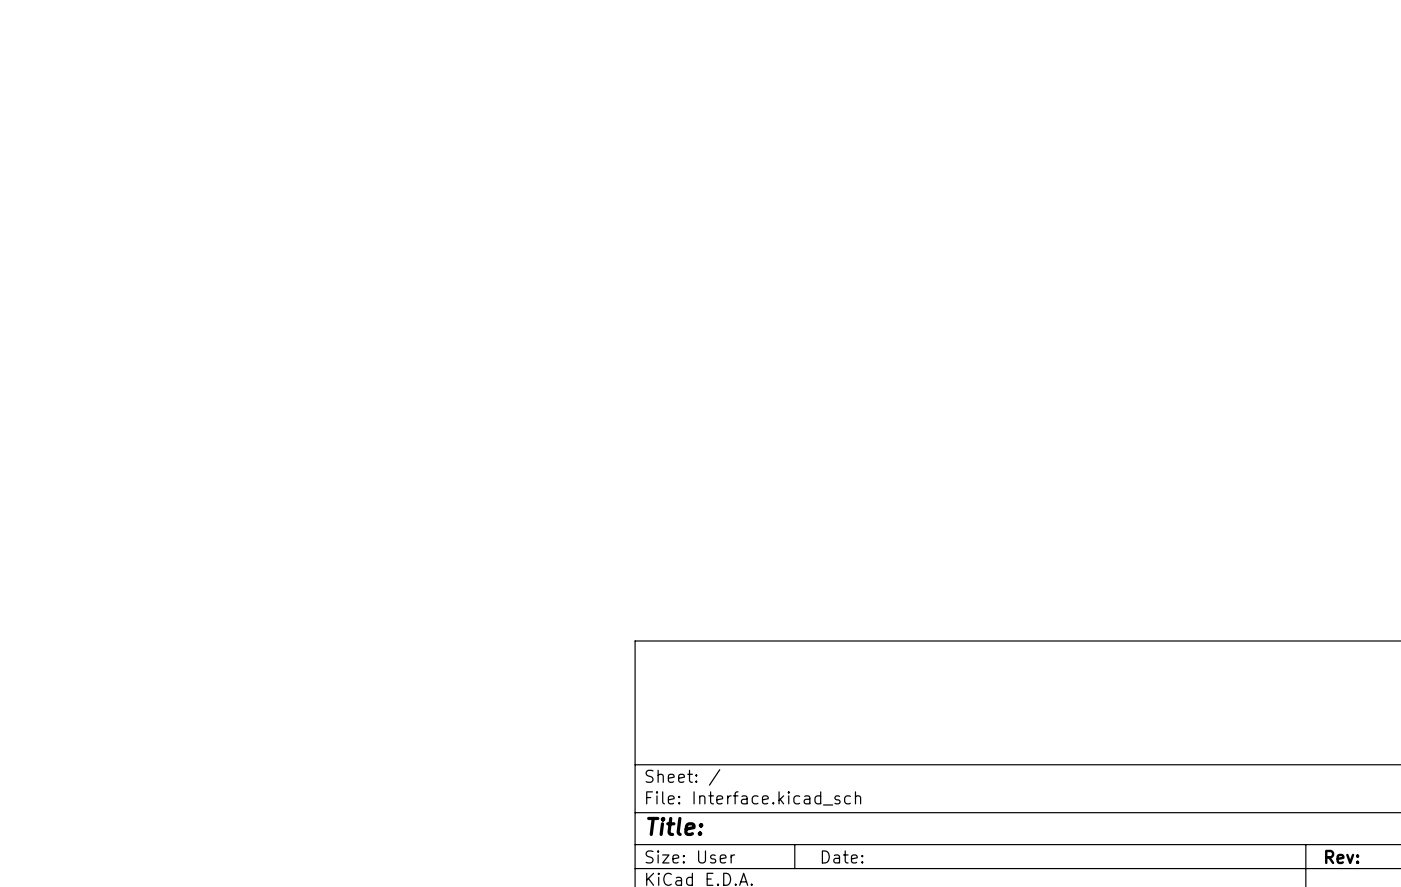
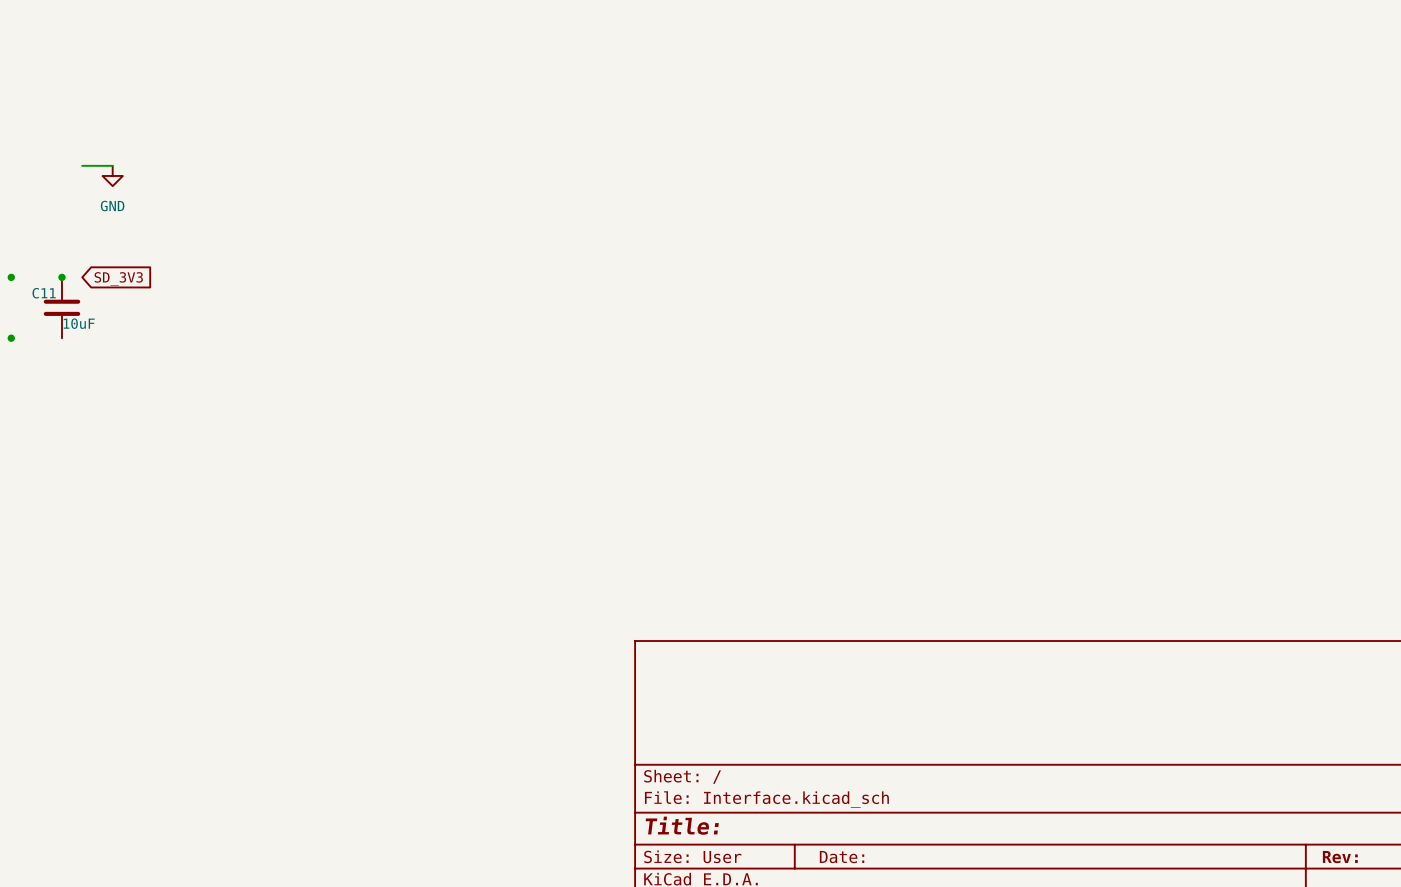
wire: none -> (82, 165) (112, 165)
power symbol: none -> GND (112, 175)
junction: none -> (11, 277)
junction: none -> (61, 277)
global label: none -> SD_3V3 (118, 278)
C11: none -> 10uF (61, 307)
junction: none -> (11, 338)

